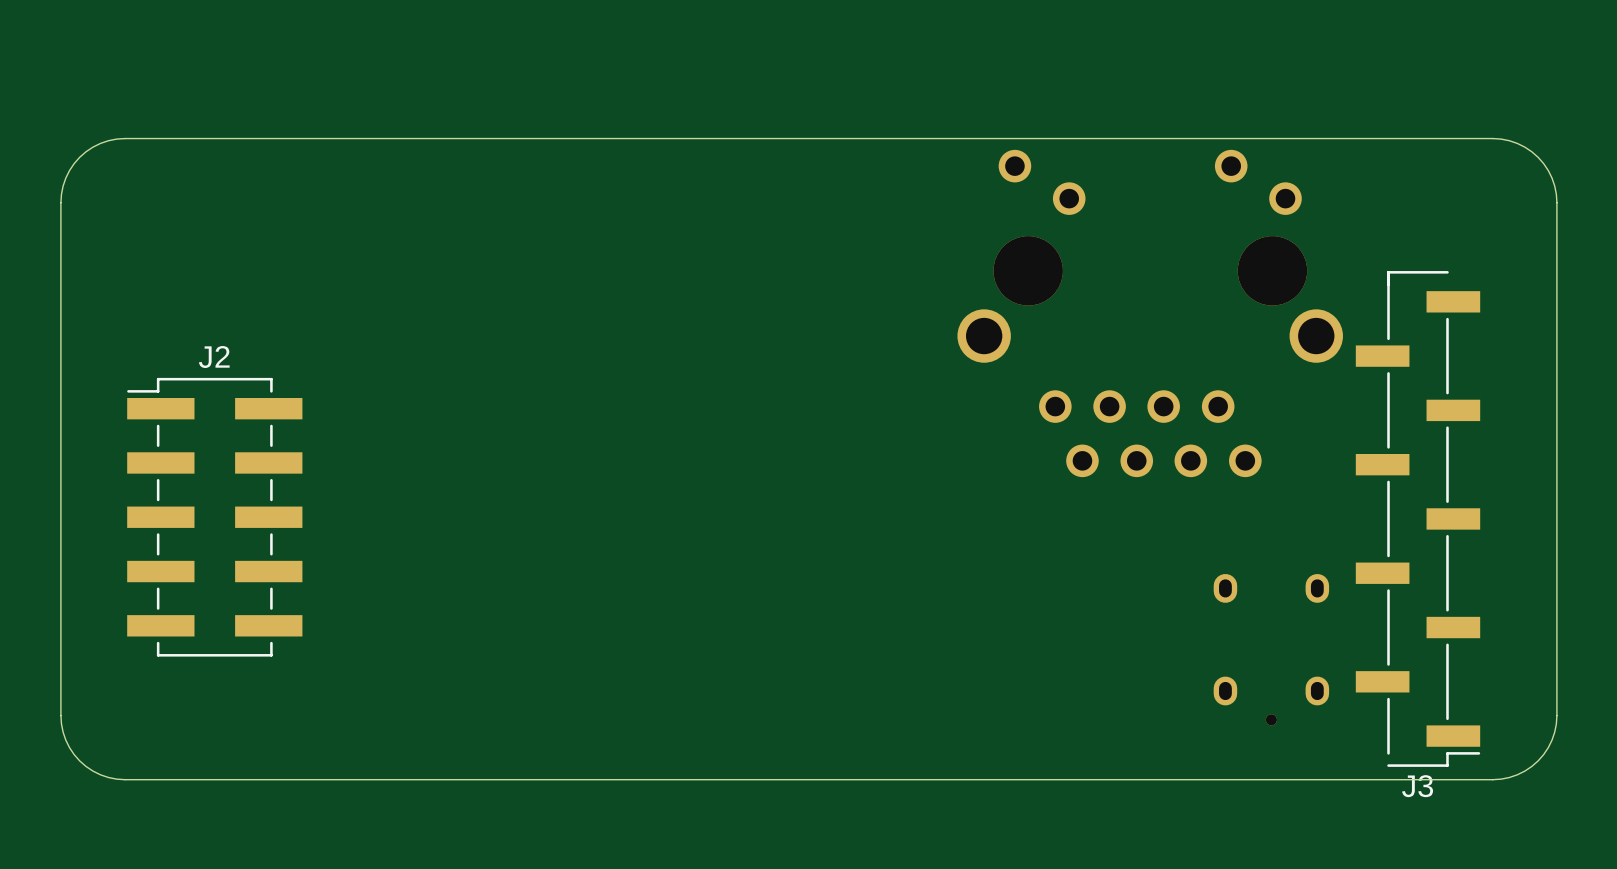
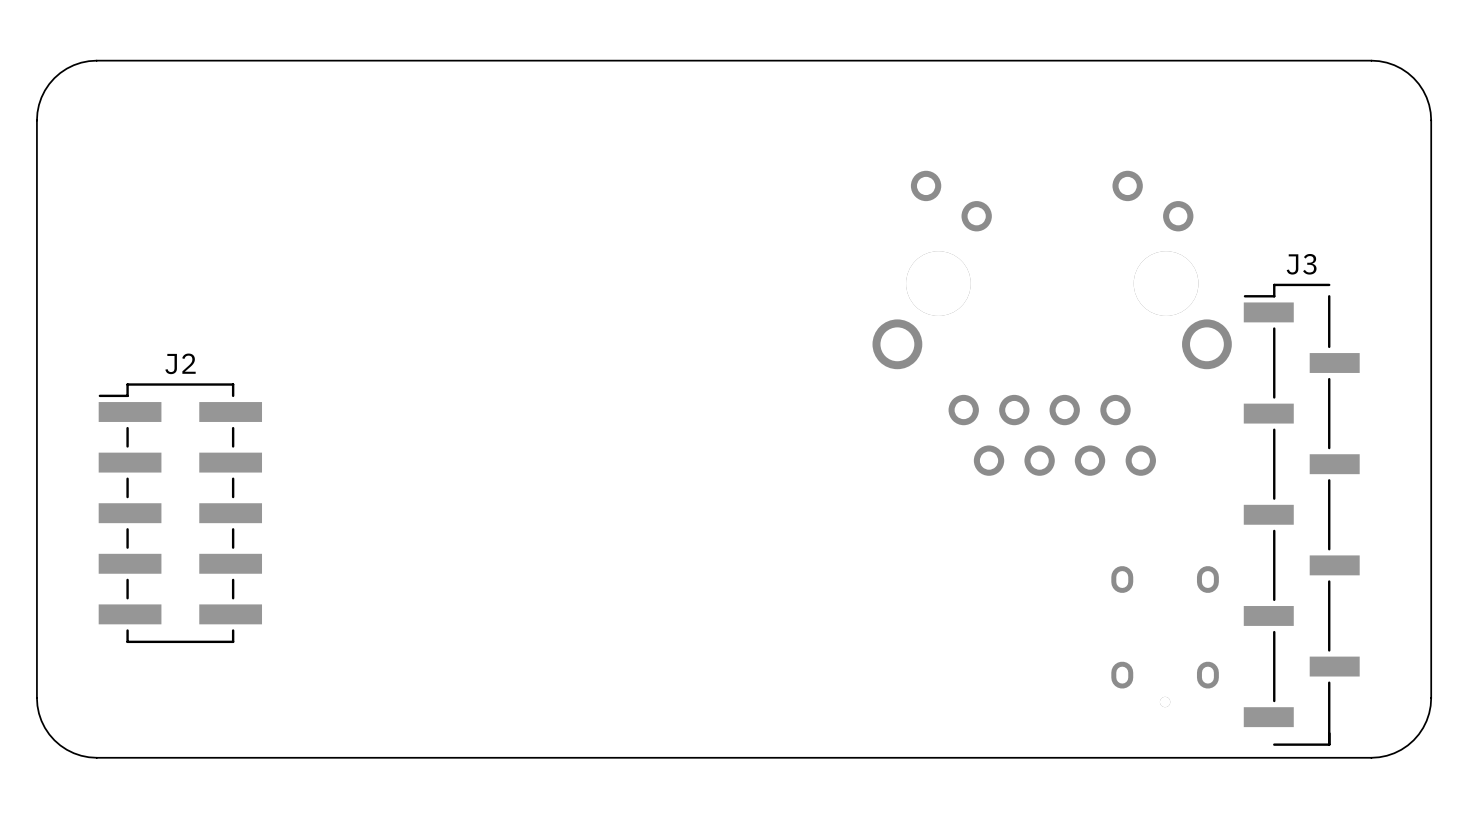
board edge: (1556, 202) (1552, 178) (1538, 157) (1517, 143) (1492, 138) (125, 138) (100, 143) (79, 157) (65, 178) (60, 202) -> (1431, 219) (1431, 120) (1426, 97) (1418, 84) (1407, 73) (1394, 65) (1371, 60) (88, 61) (73, 65) (60, 73) (44, 90) (38, 104) (36, 120) (36, 219)
J3 rotation: 0° (1418, 518) -> 180° (1301, 514)

